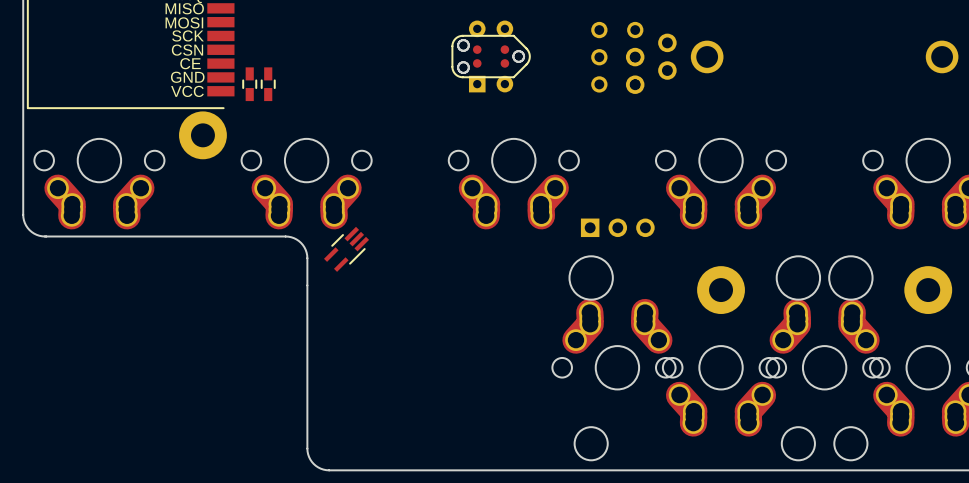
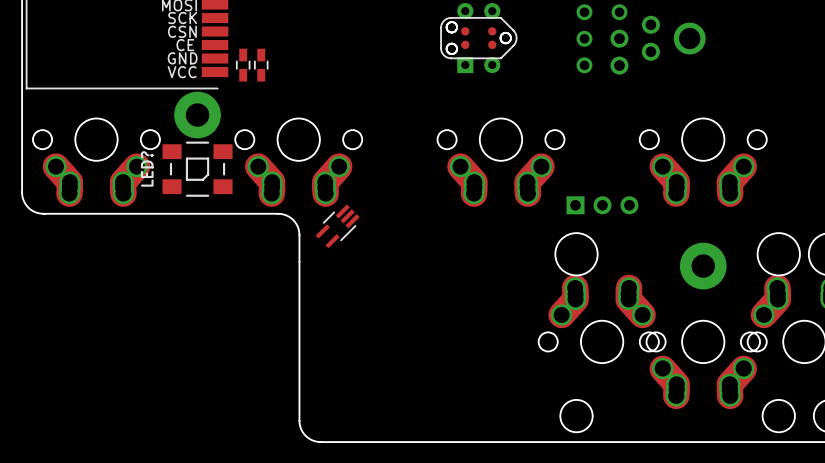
LED?: none -> (197, 169)

